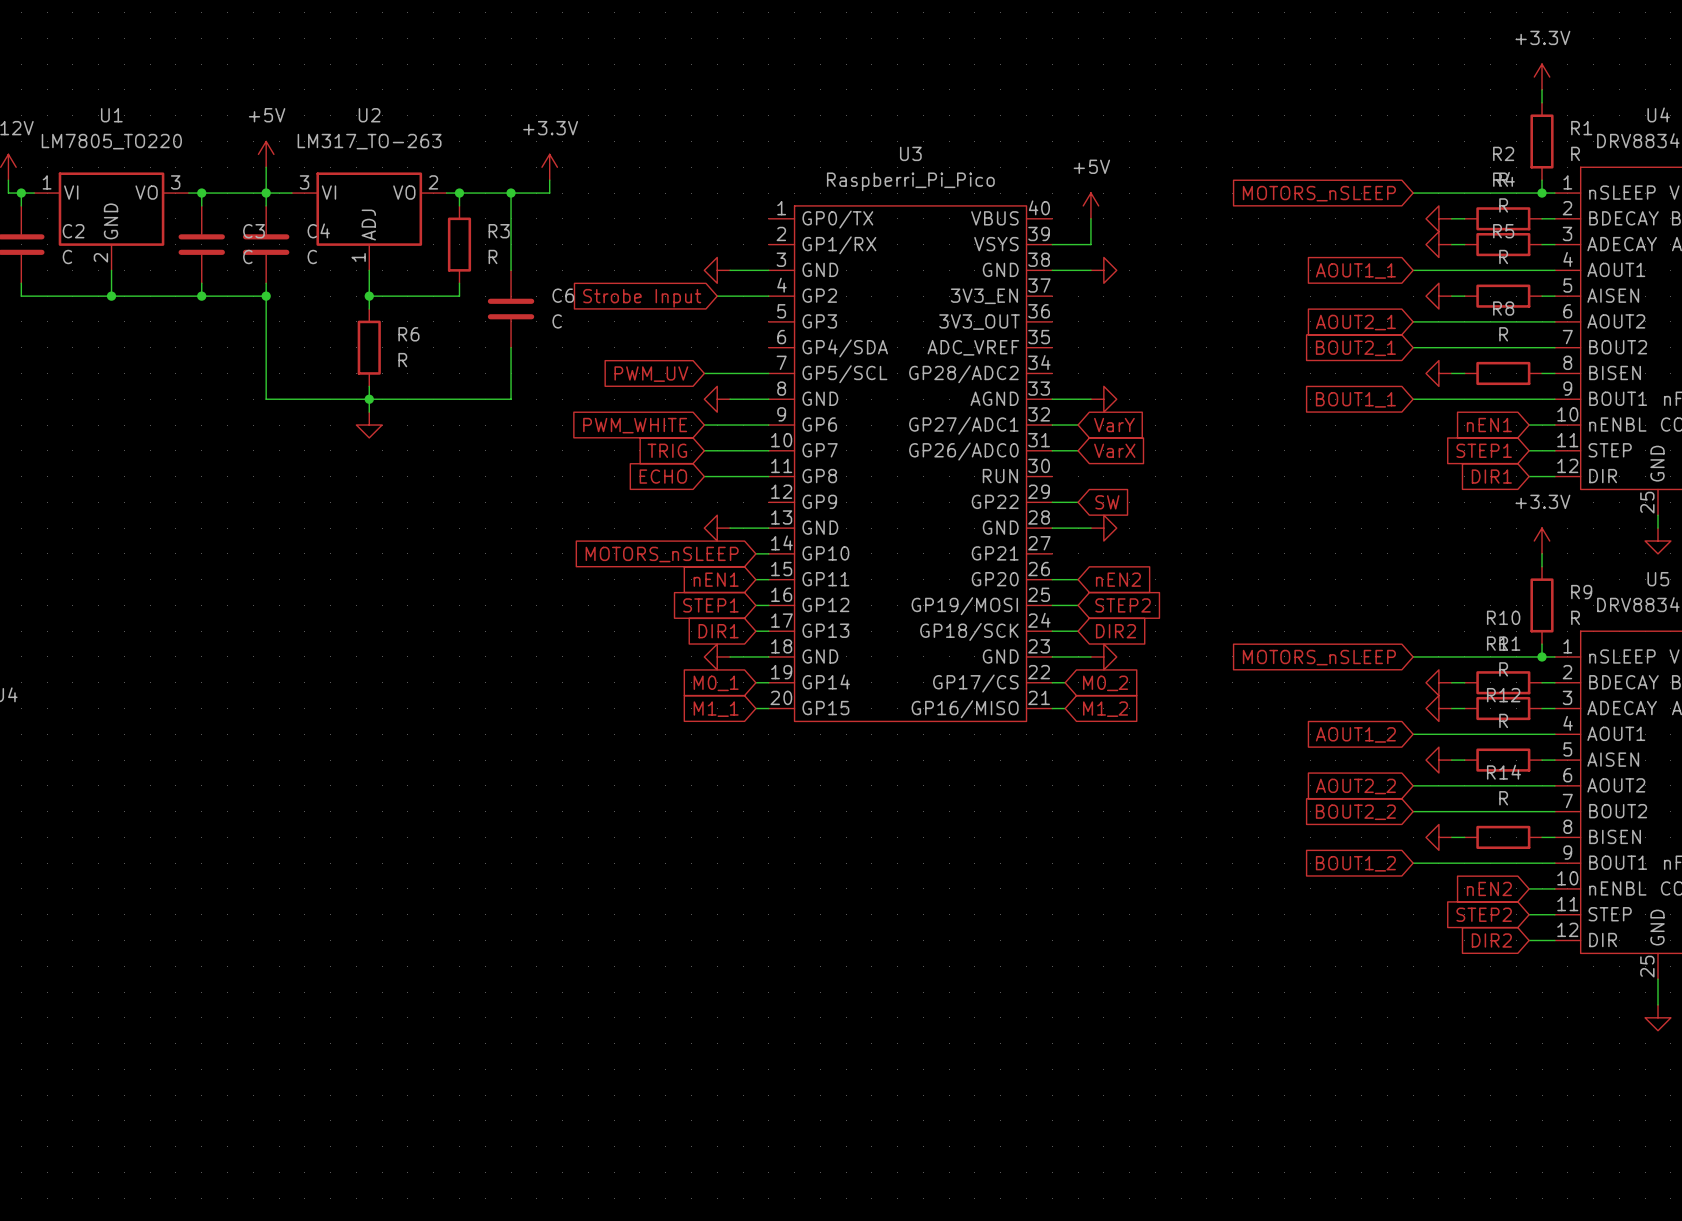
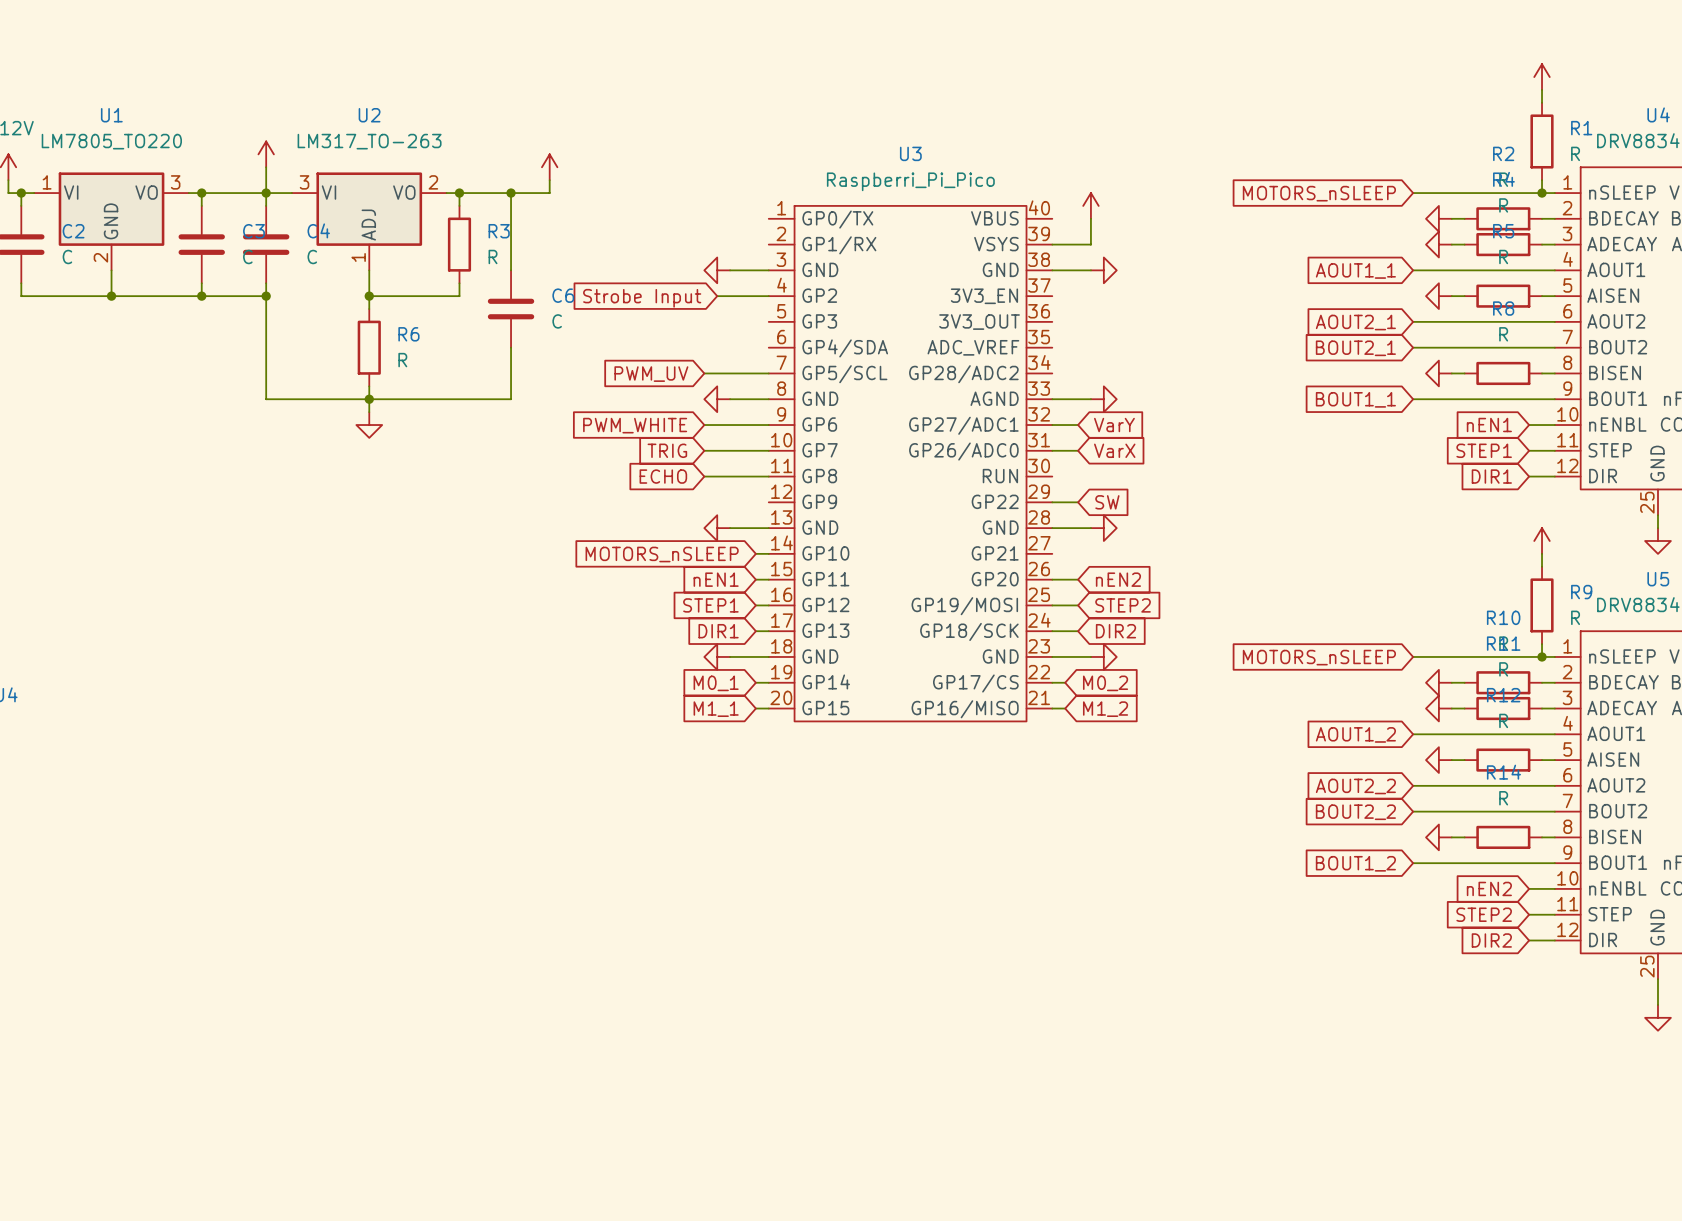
power symbol text: +3.3V (1542, 37) -> none
power symbol text: +5V (267, 115) -> none
power symbol text: +3.3V (550, 128) -> none
power symbol text: +5V (1091, 166) -> none
power symbol text: +3.3V (1542, 501) -> none

